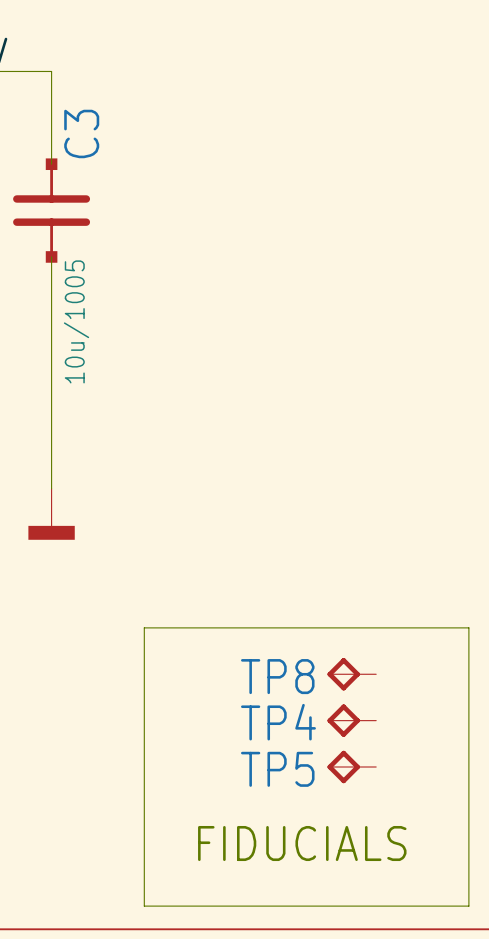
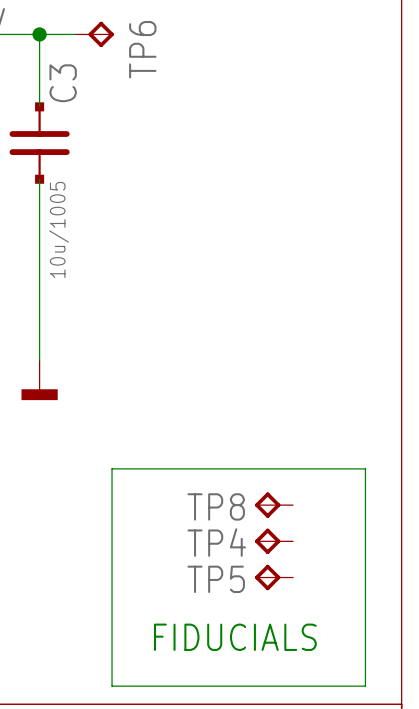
wire: none -> (39, 34) (75, 34)
junction: none -> (39, 34)
TP6: none -> (94, 34)

